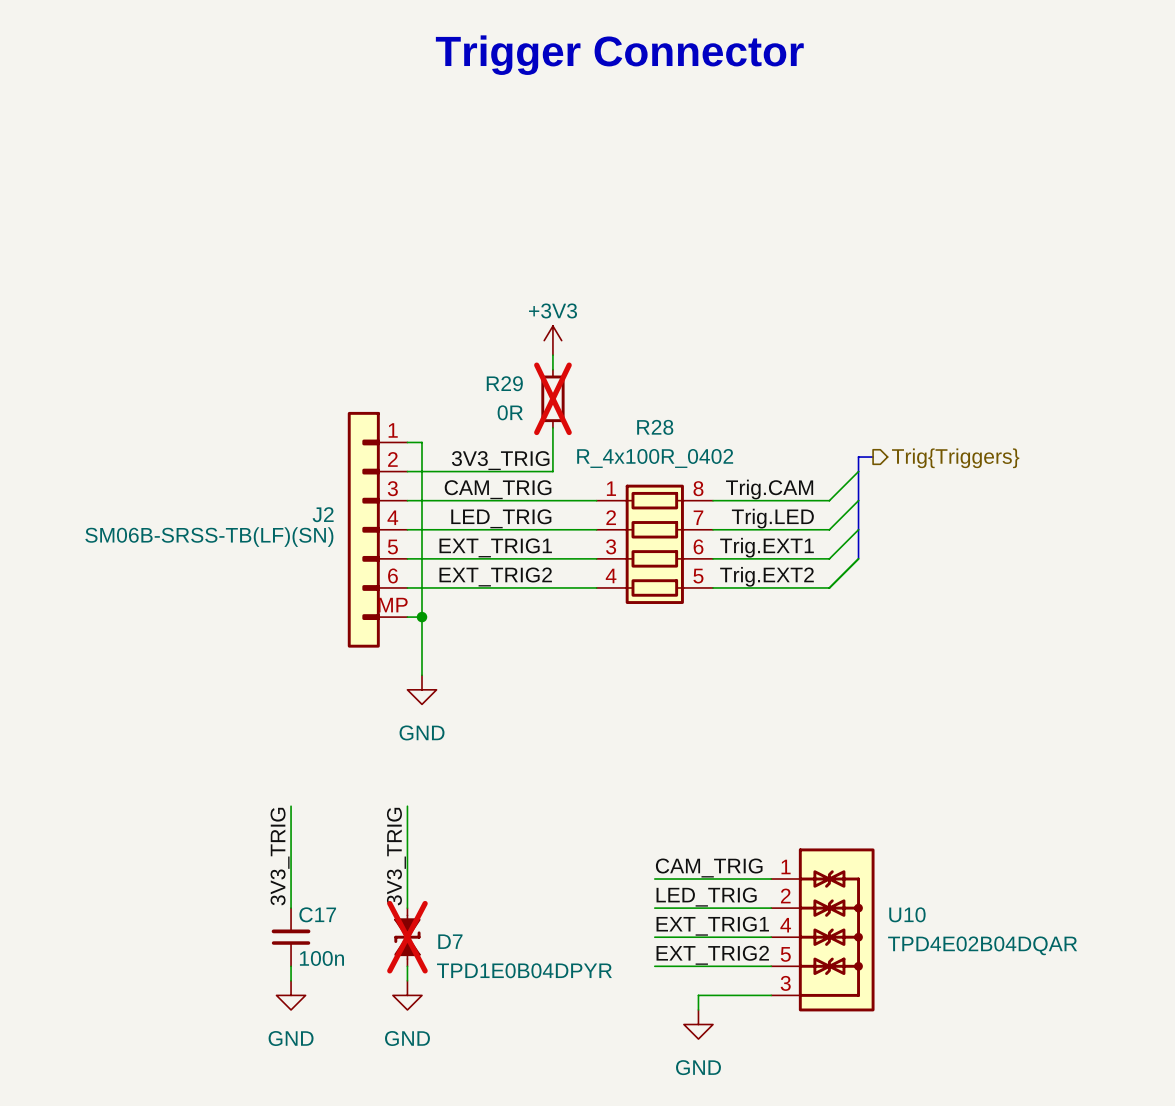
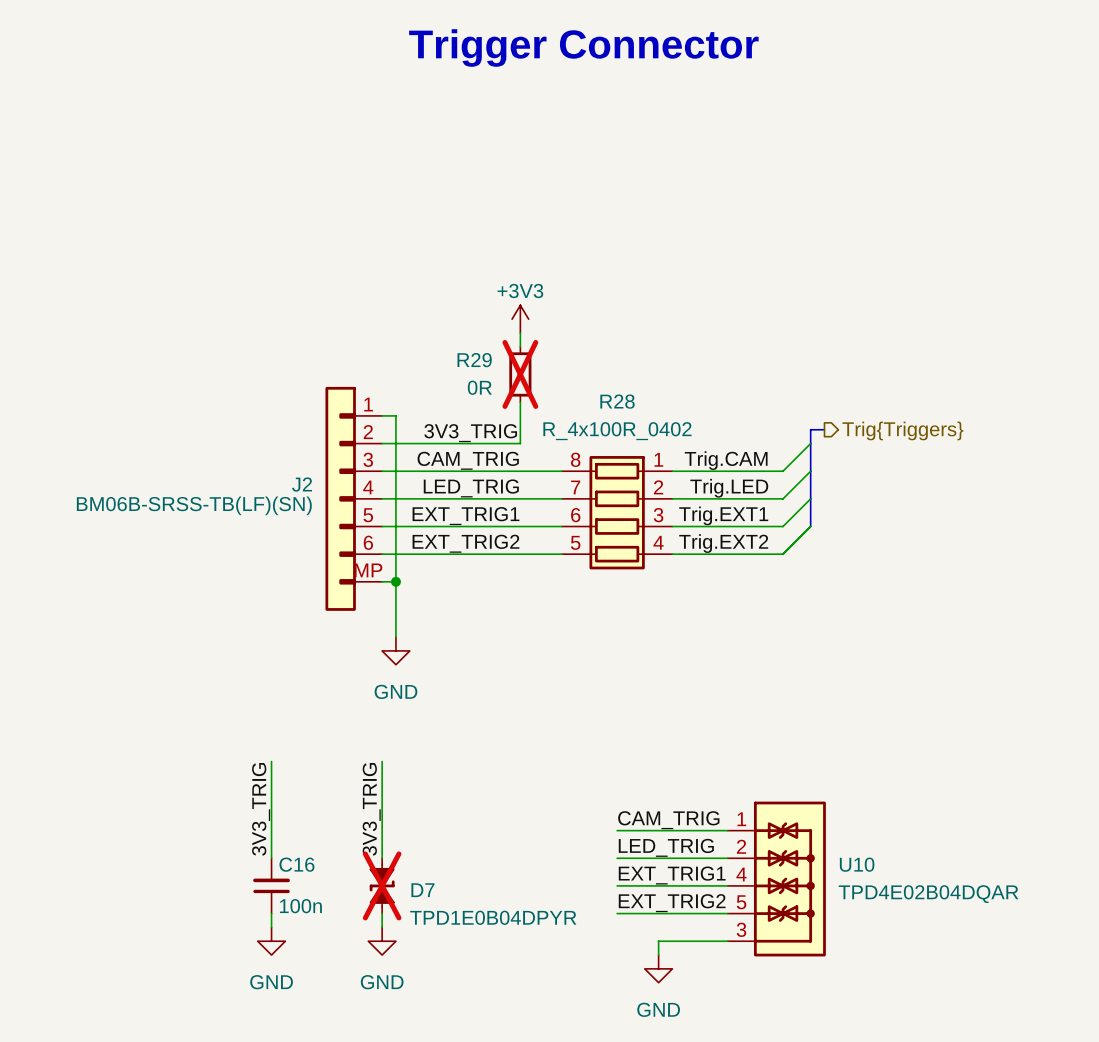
J2 text: SM06B-SRSS-TB(LF)(SN) (209, 537) -> BM06B-SRSS-TB(LF)(SN) (194, 505)
R28 flip: as is (654, 544) -> left-right (617, 512)
C17 name: C17 (317, 914) -> C16 (296, 864)

